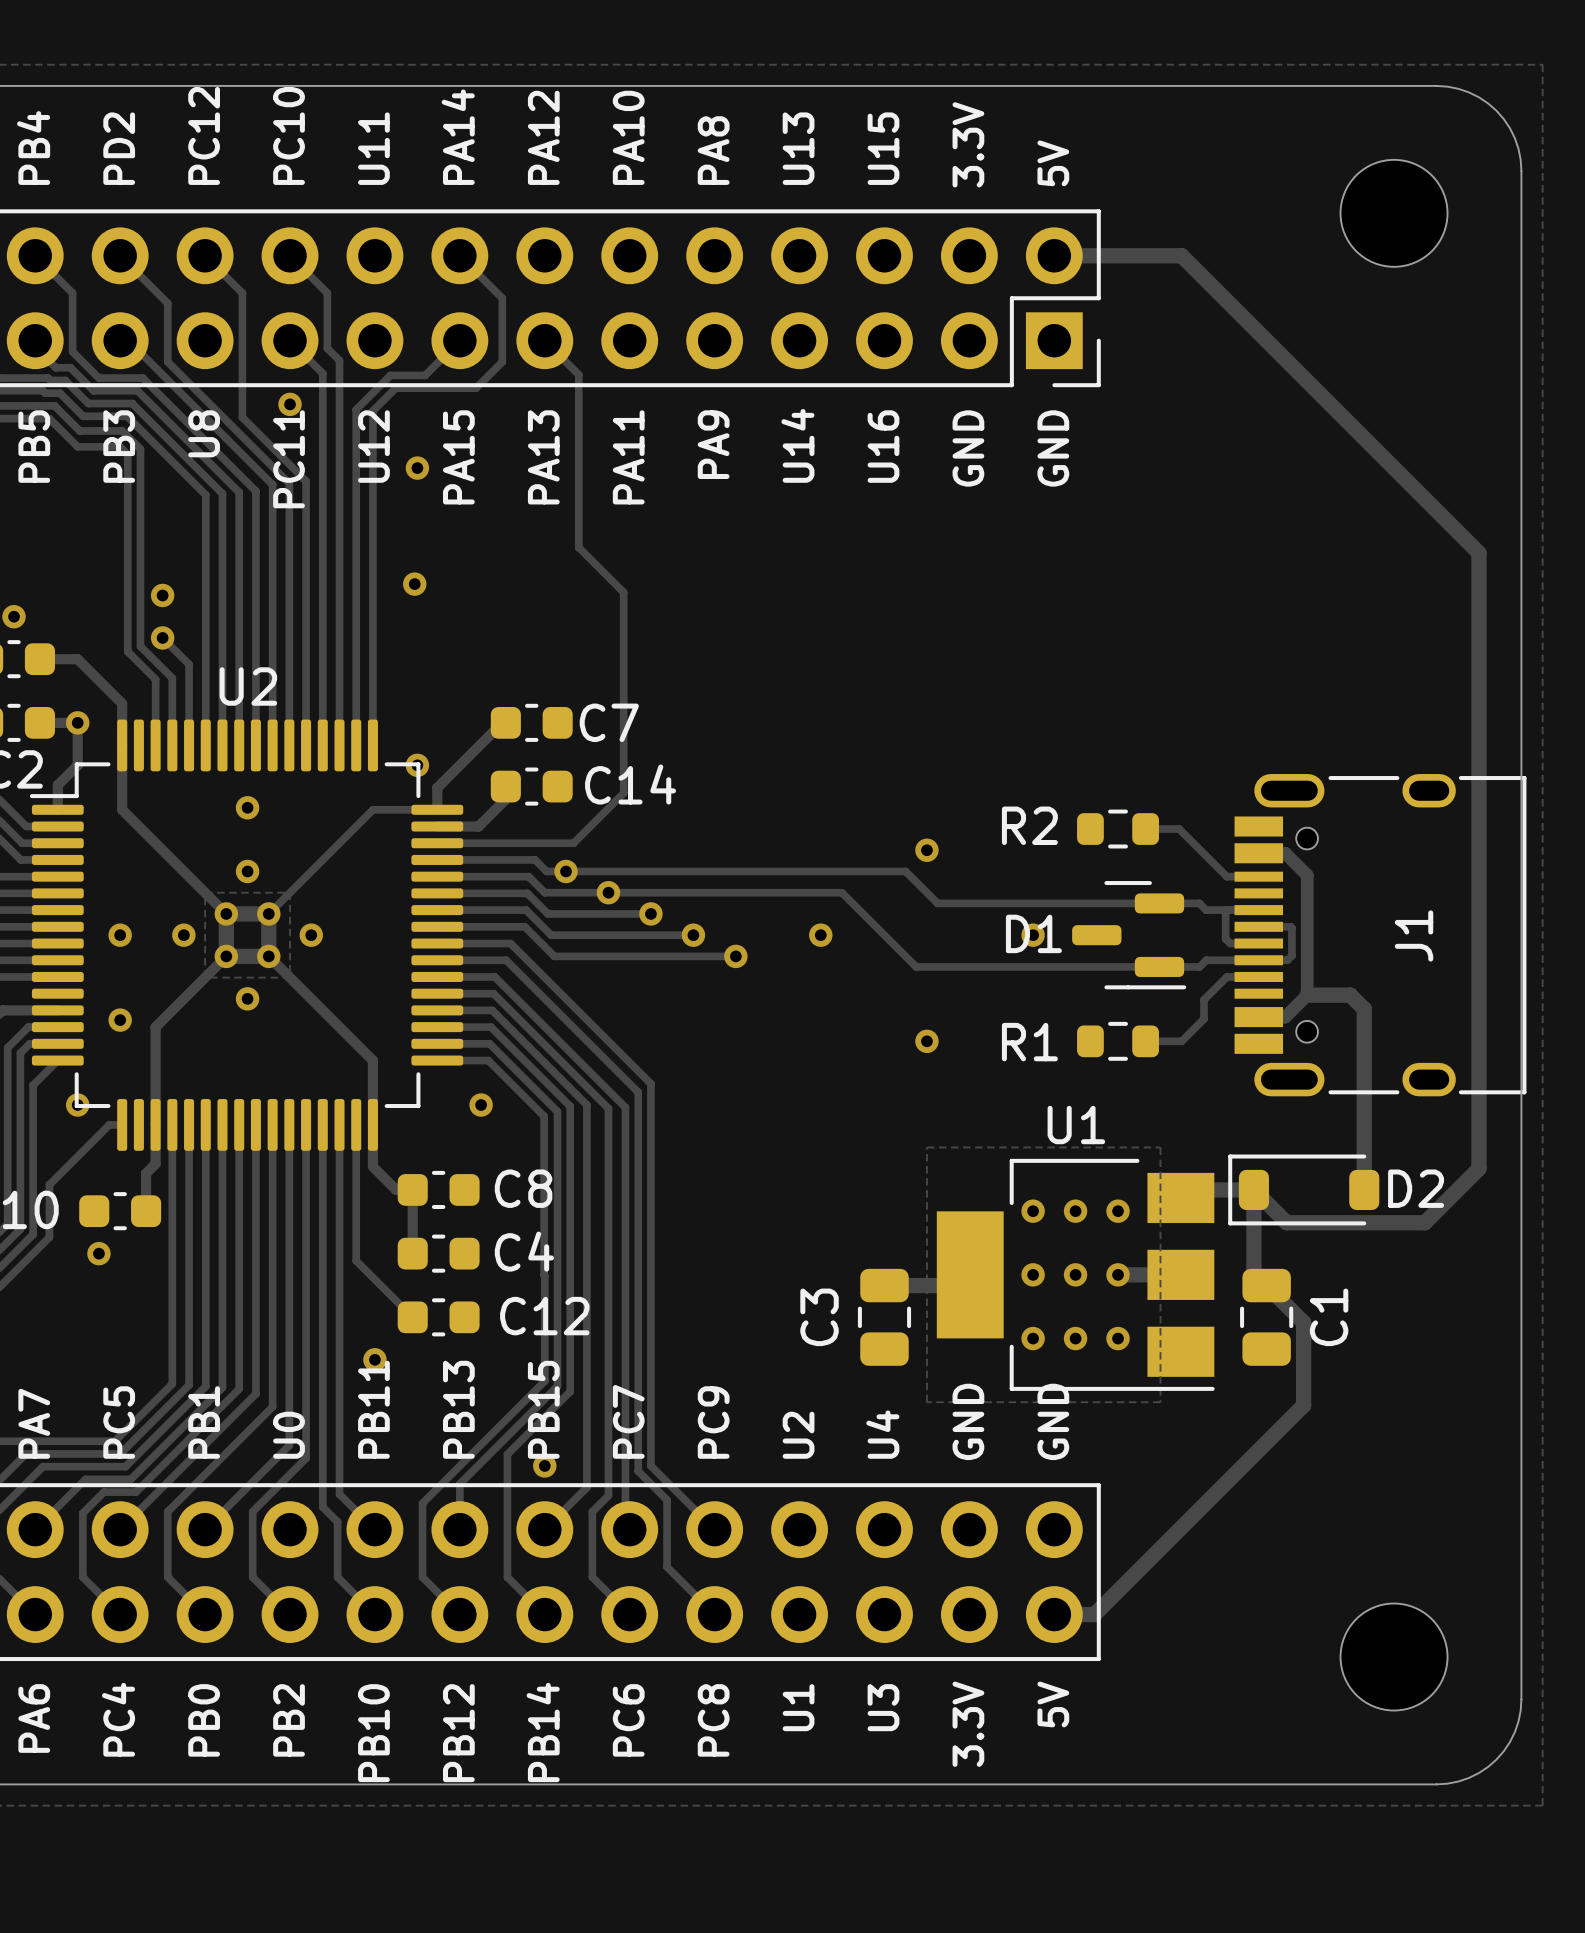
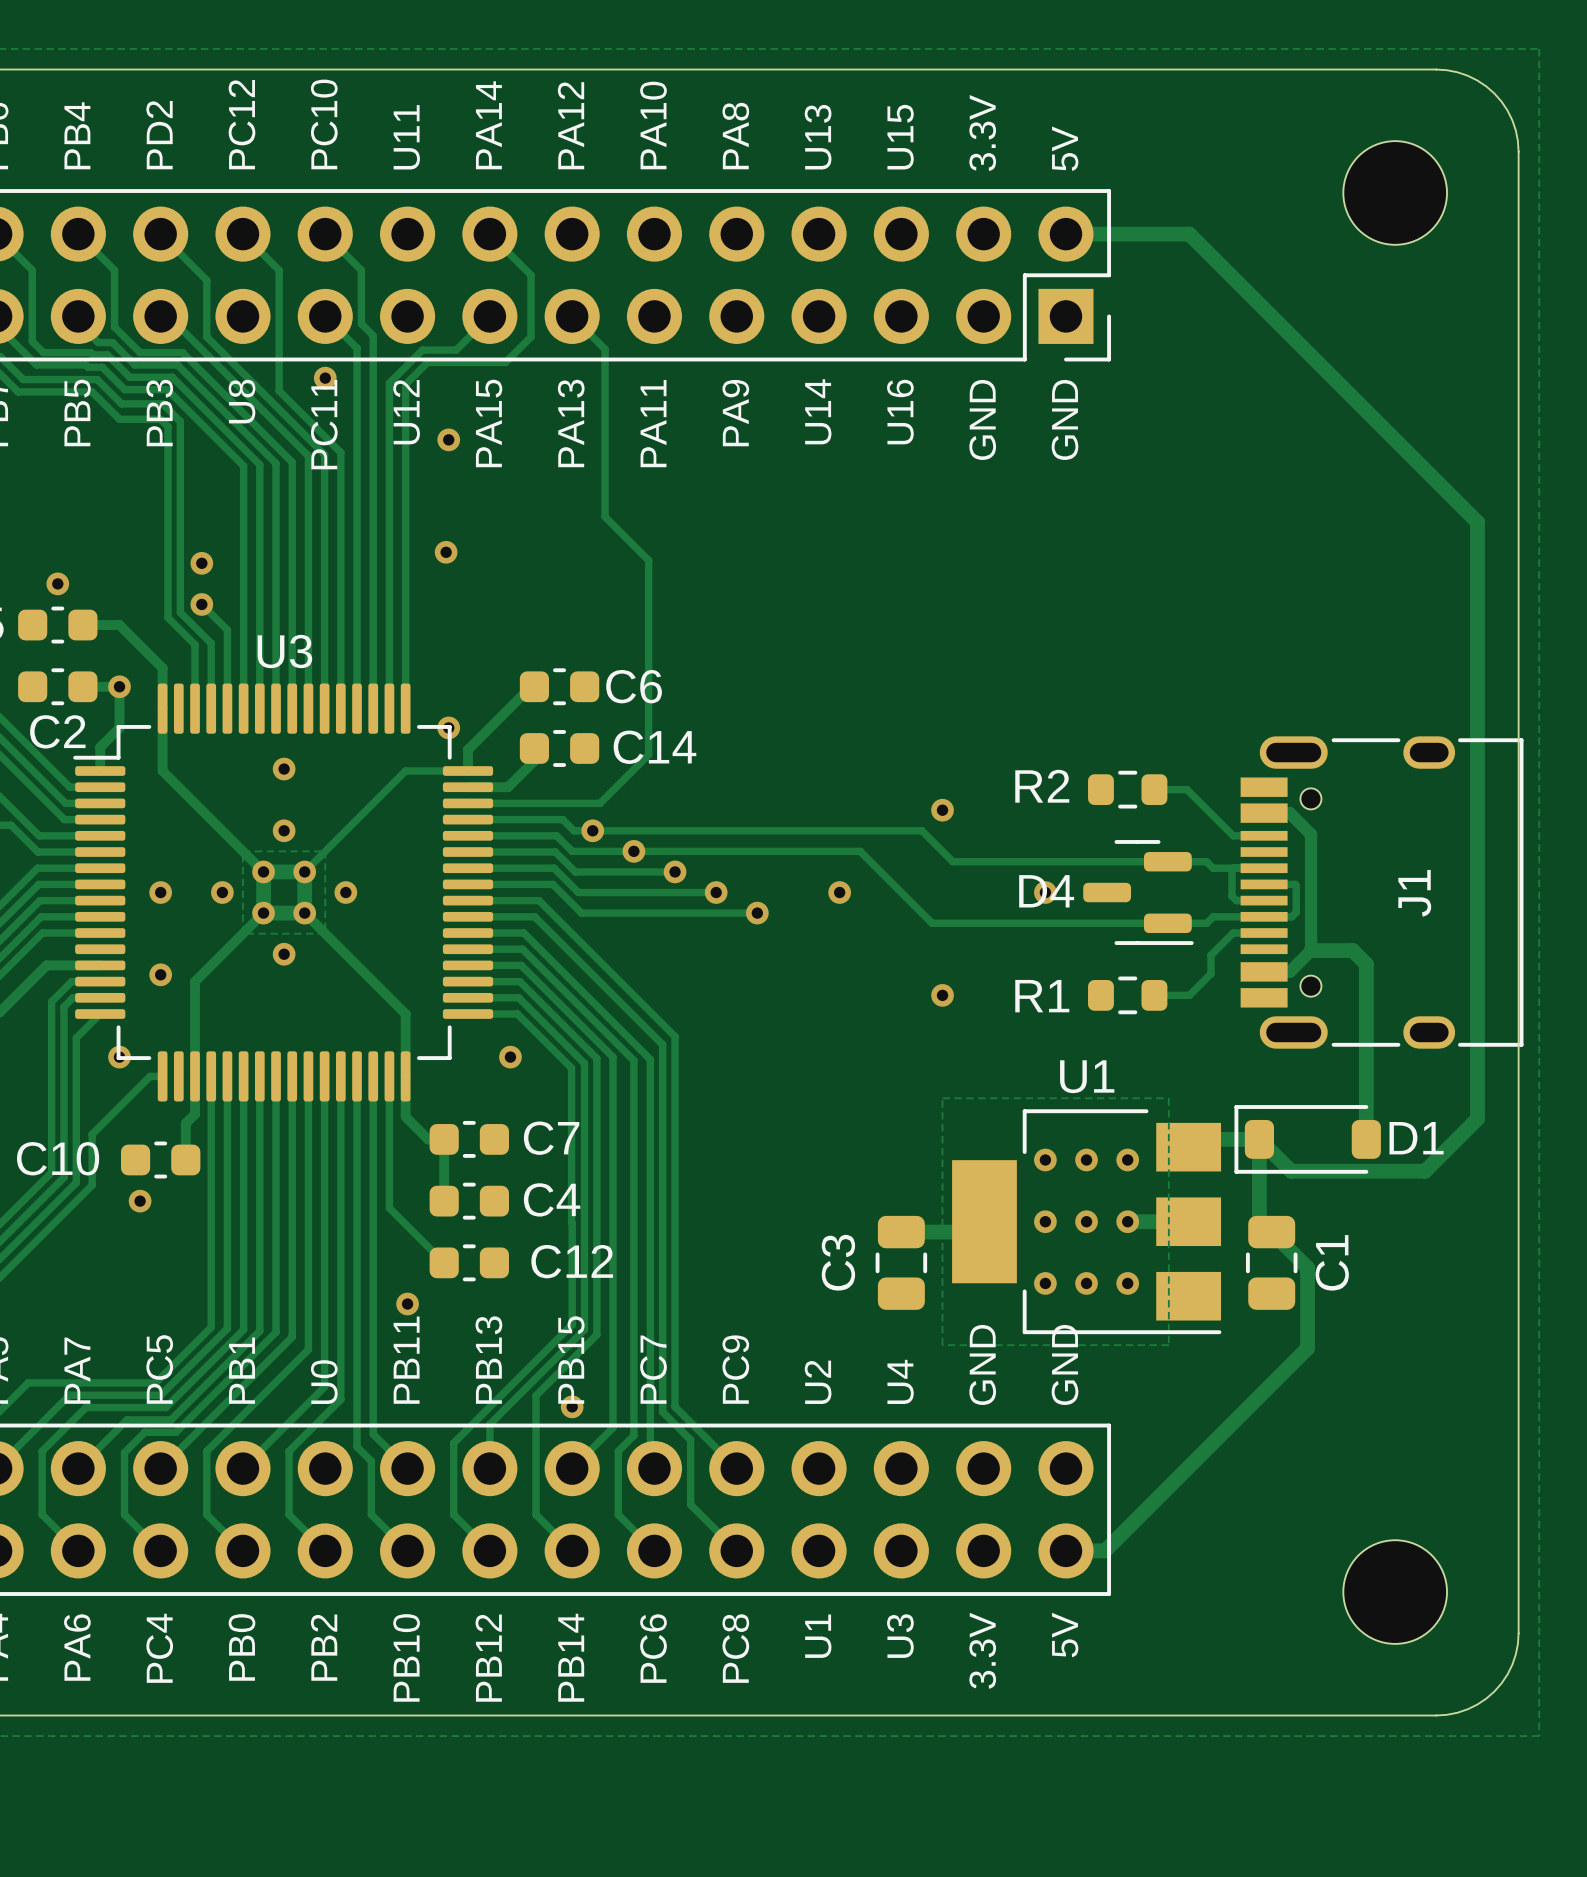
U2 name: U2 (248, 686) -> U3 (284, 651)
C7 name: C7 (609, 722) -> C6 (634, 686)
D1 name: D1 (1033, 933) -> D4 (1046, 891)
C8 name: C8 (523, 1188) -> C7 (551, 1138)
D2 name: D2 (1416, 1188) -> D1 (1416, 1138)

